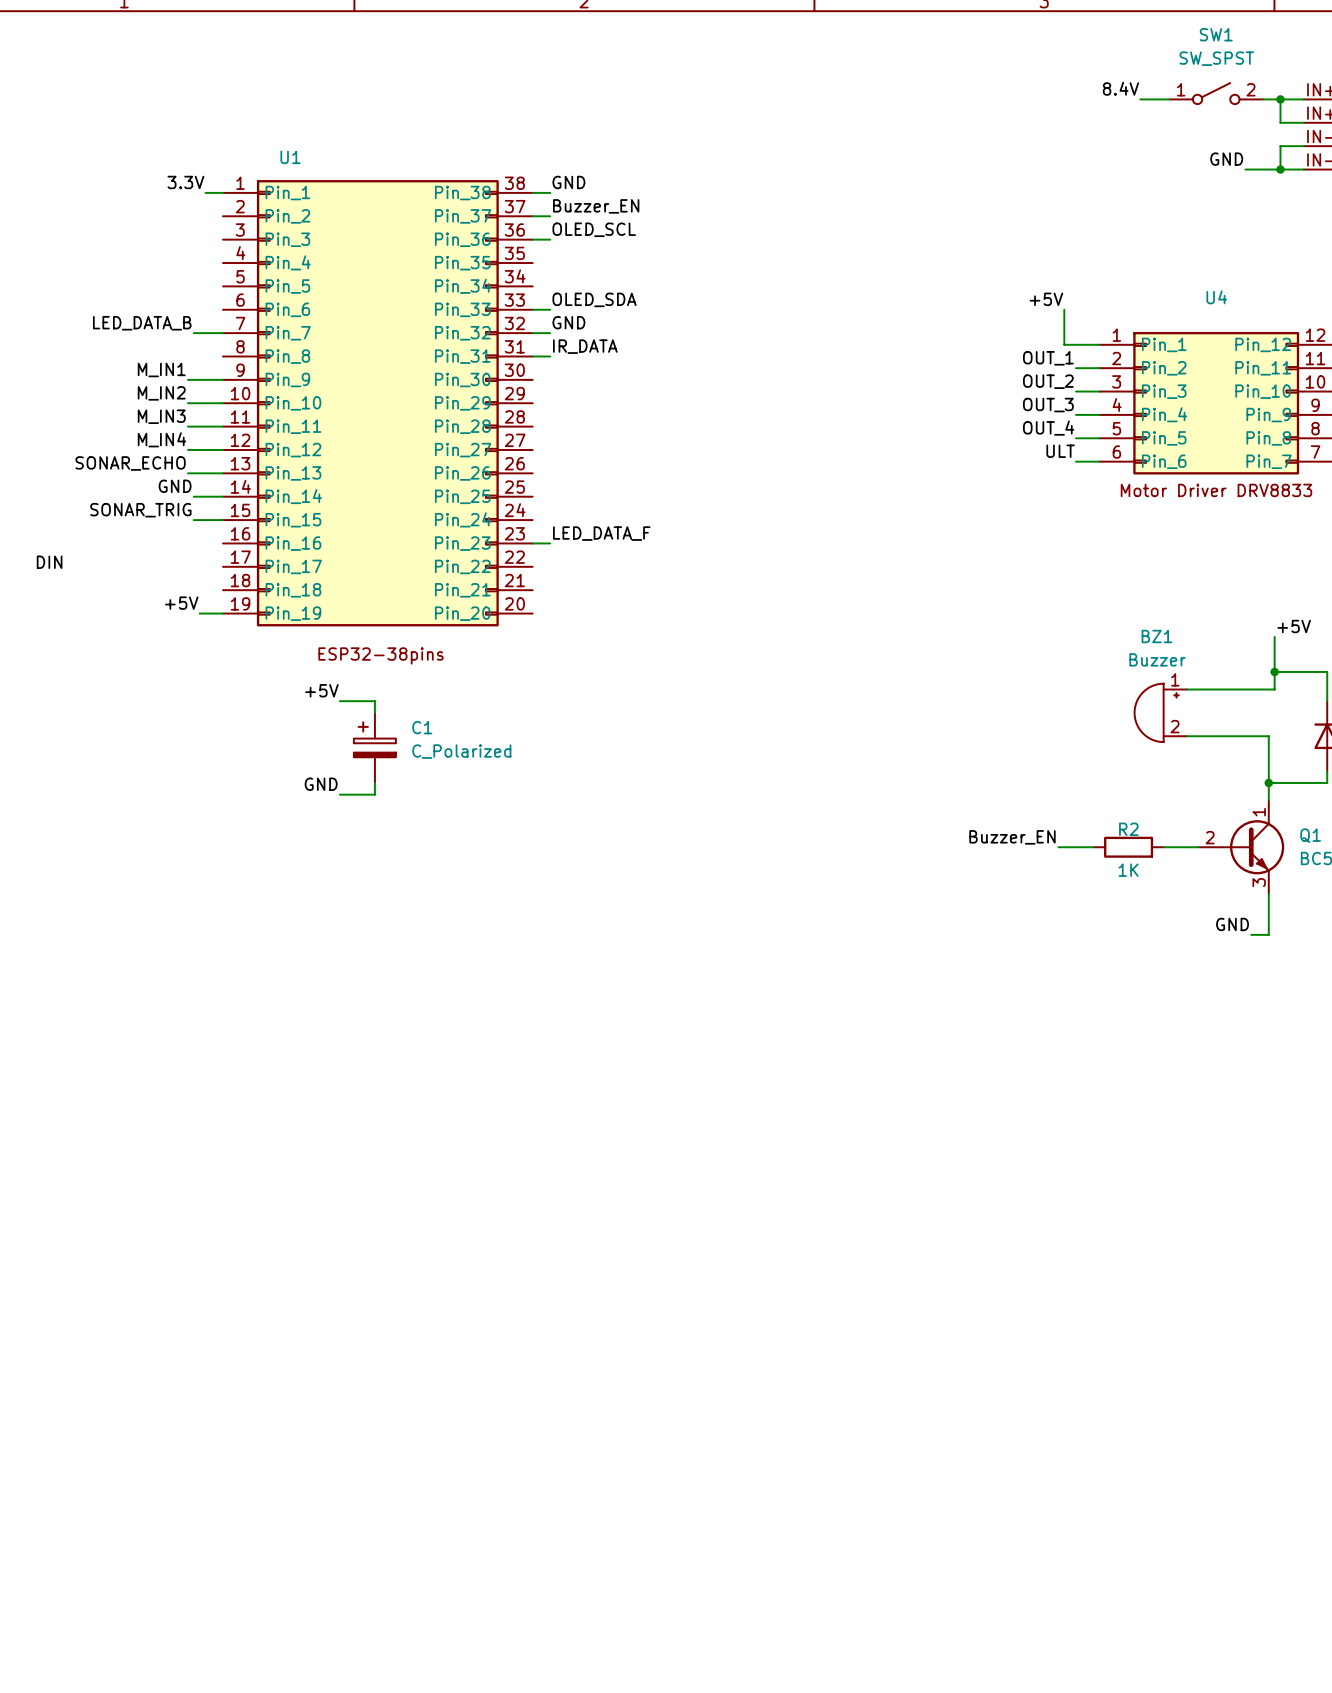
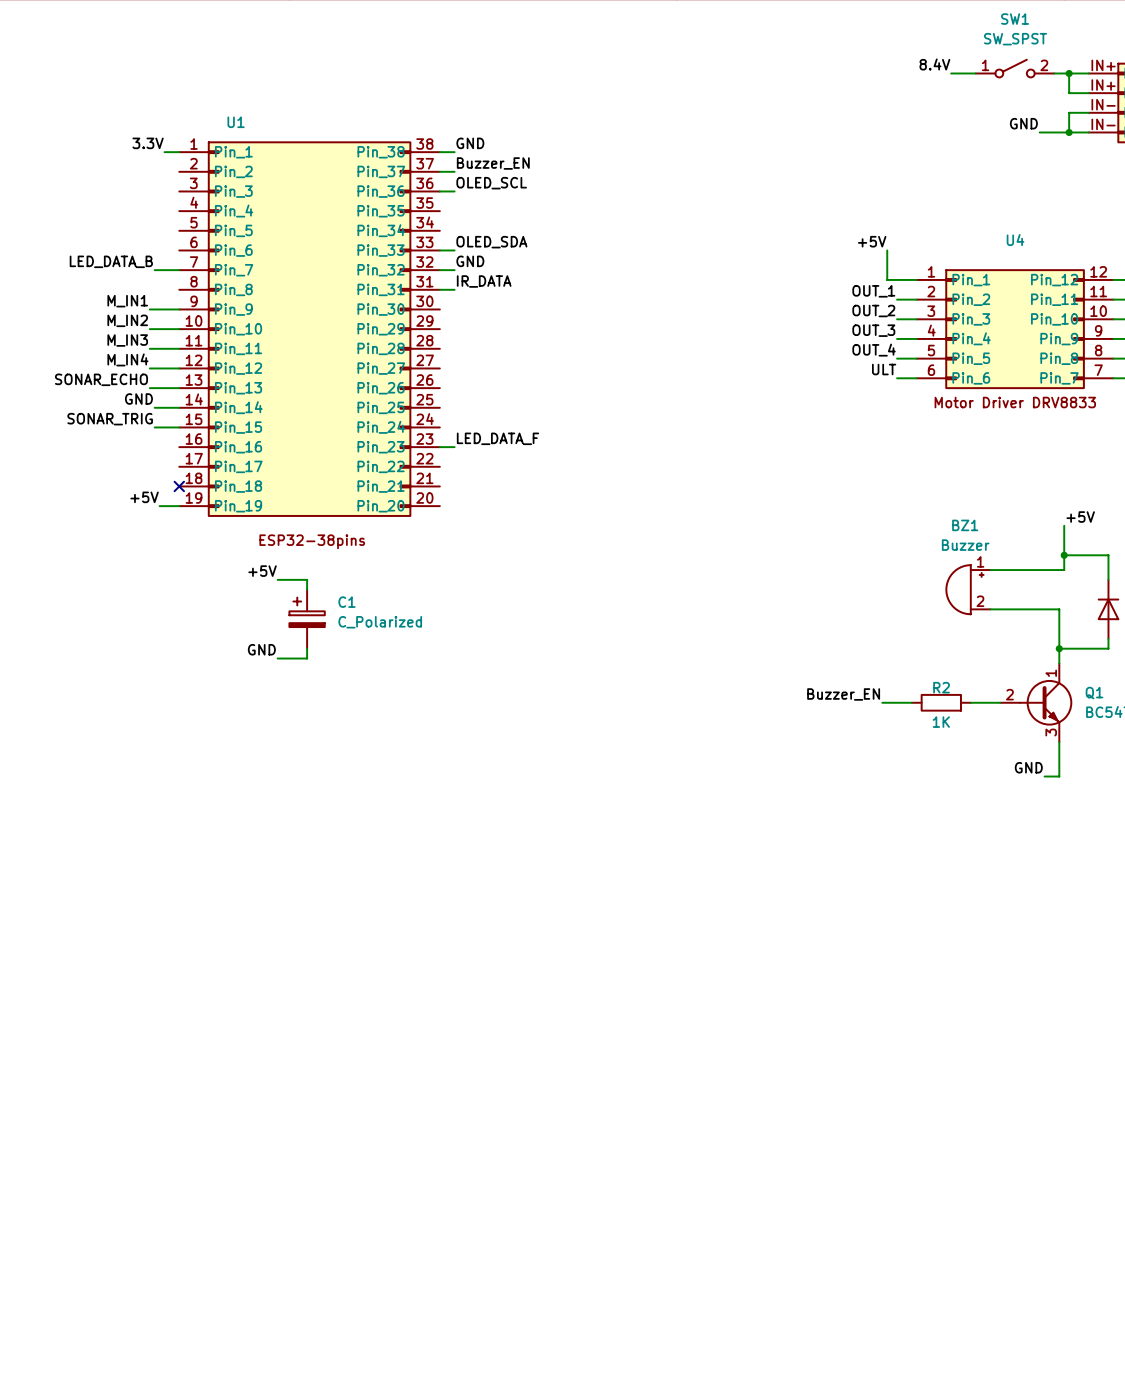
label: DIN (49, 562) -> none
no-connect mark: none -> (179, 486)

